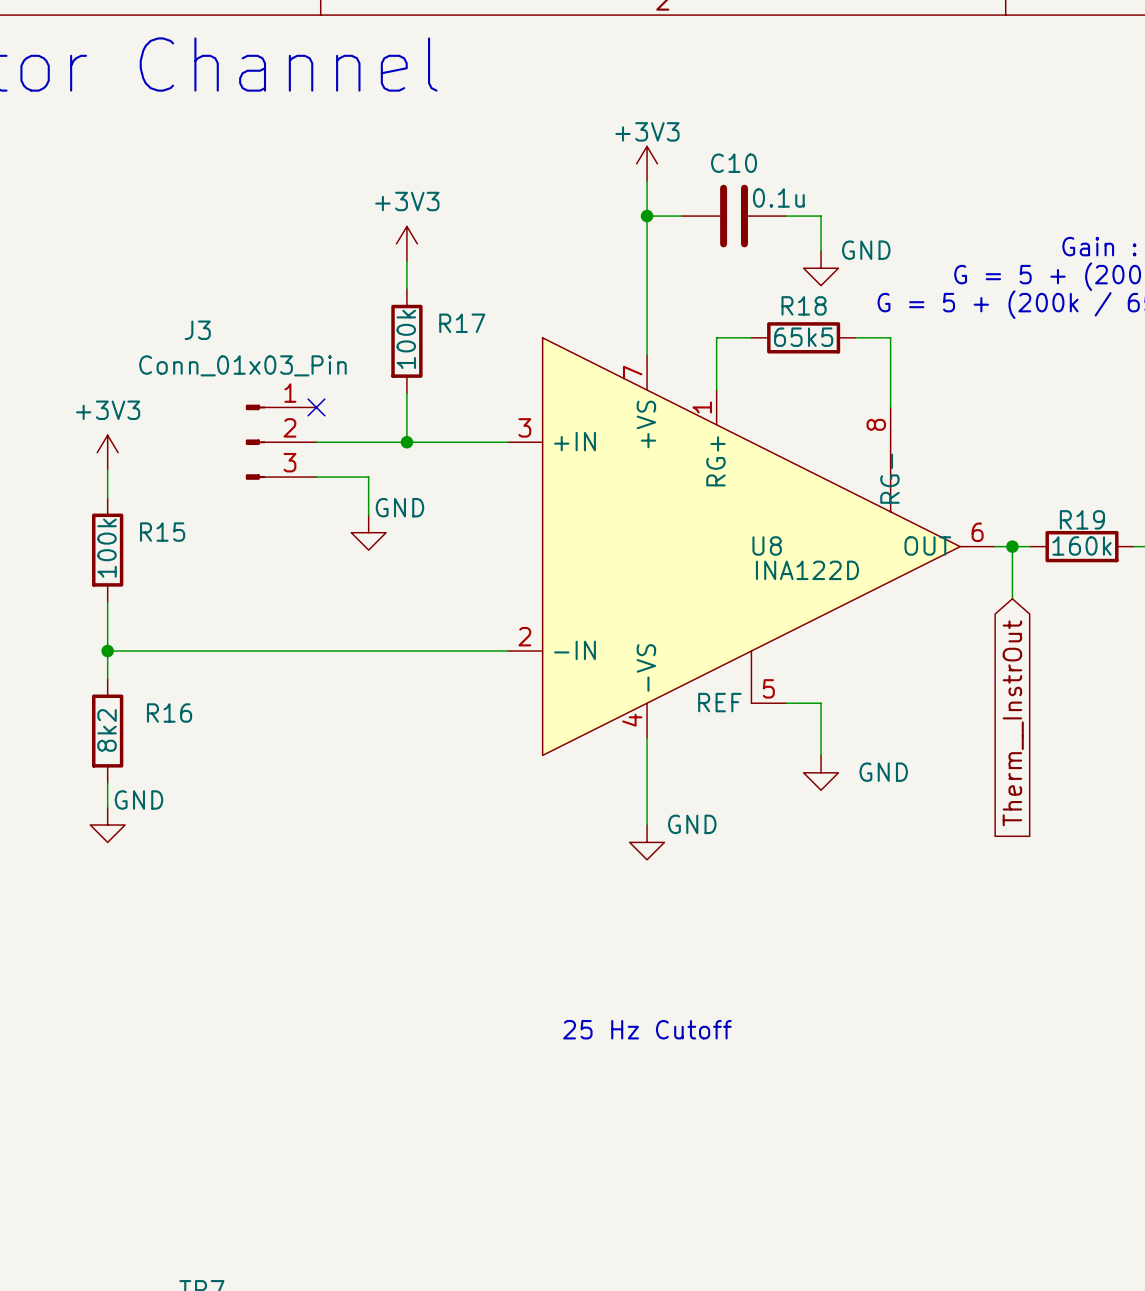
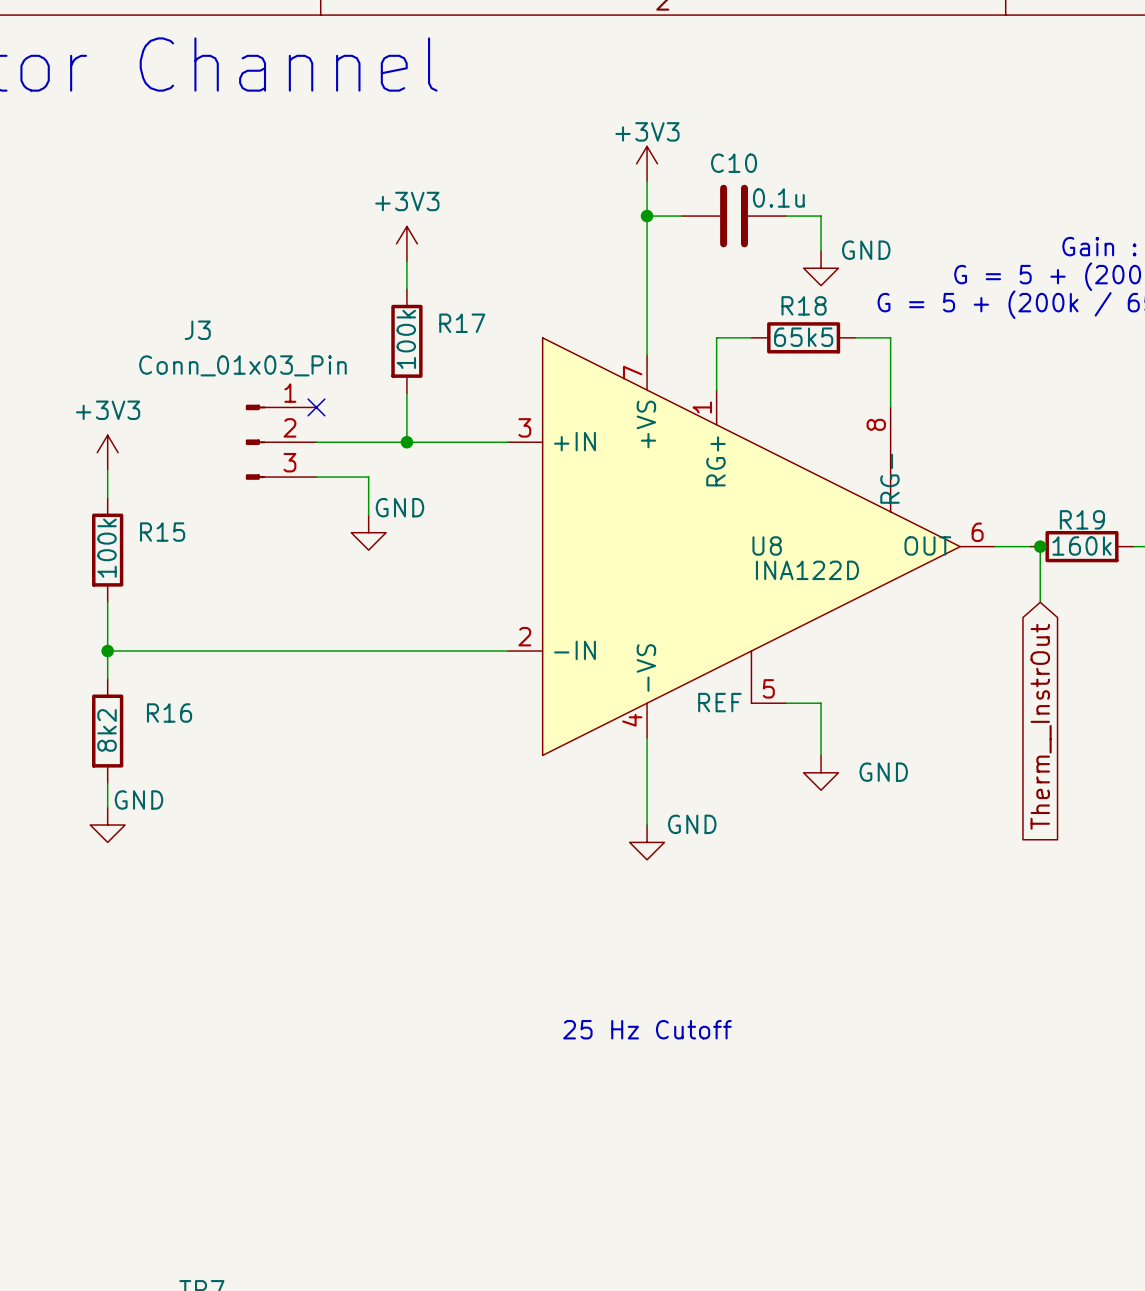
wire: (1012, 546) (1012, 598) -> none
junction position: (1012, 546) -> (1040, 546)
wire: none -> (1040, 546) (1040, 602)
global label position: Therm__InstrOut (1013, 723) -> Therm__InstrOut (1041, 726)

